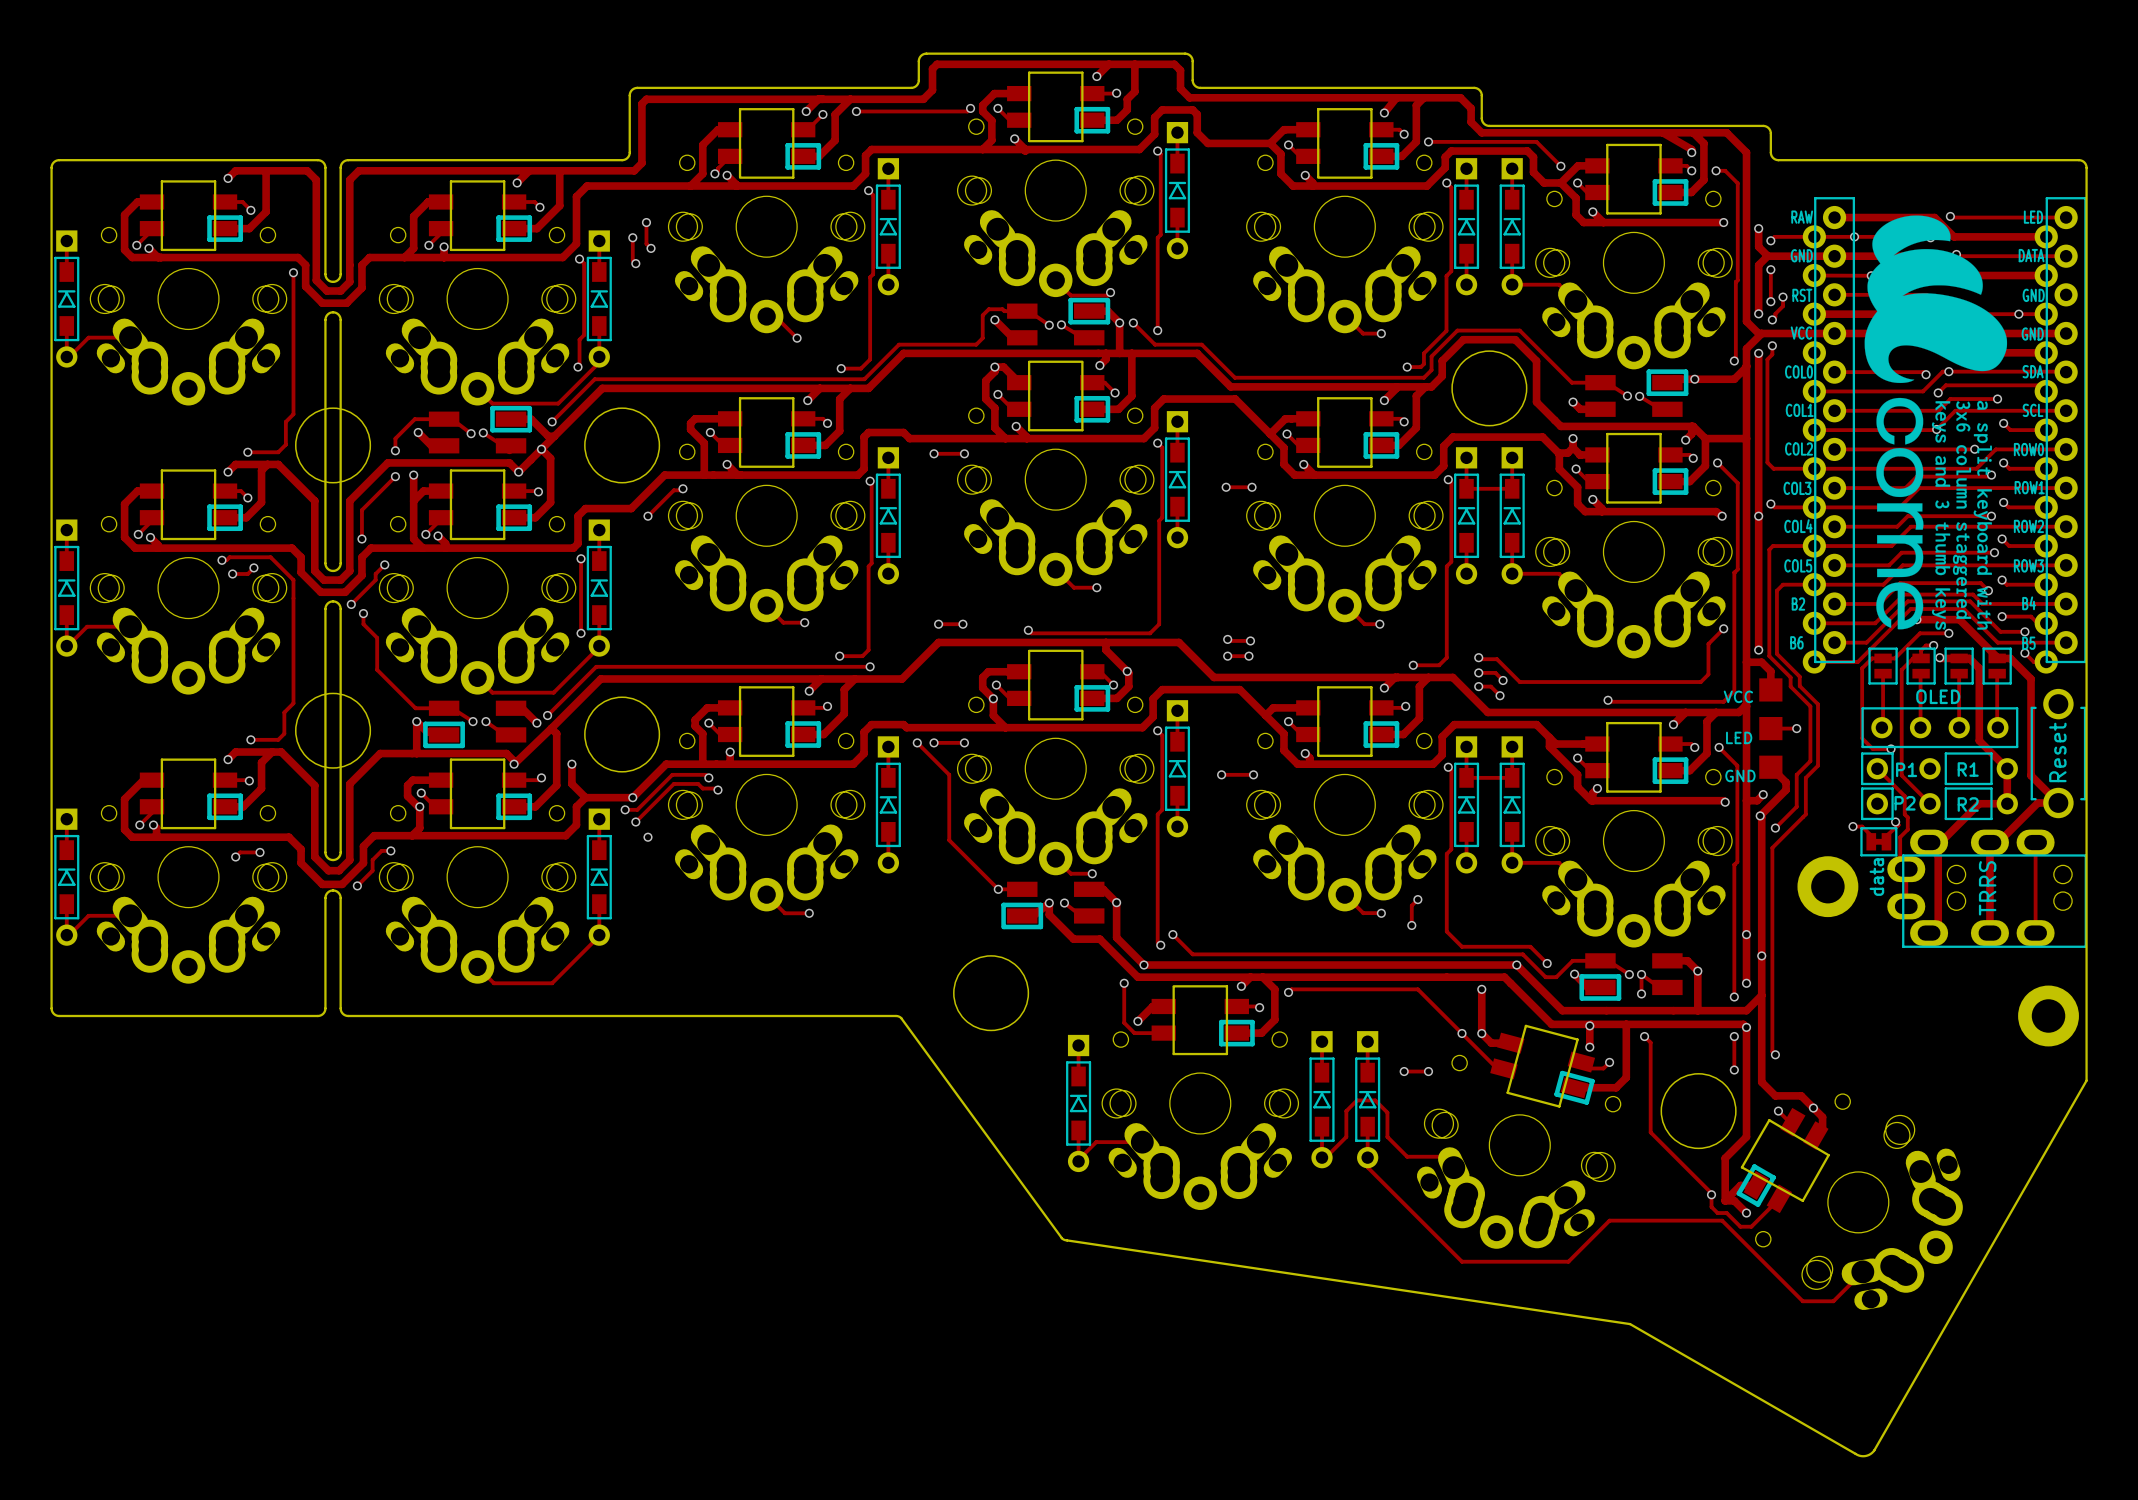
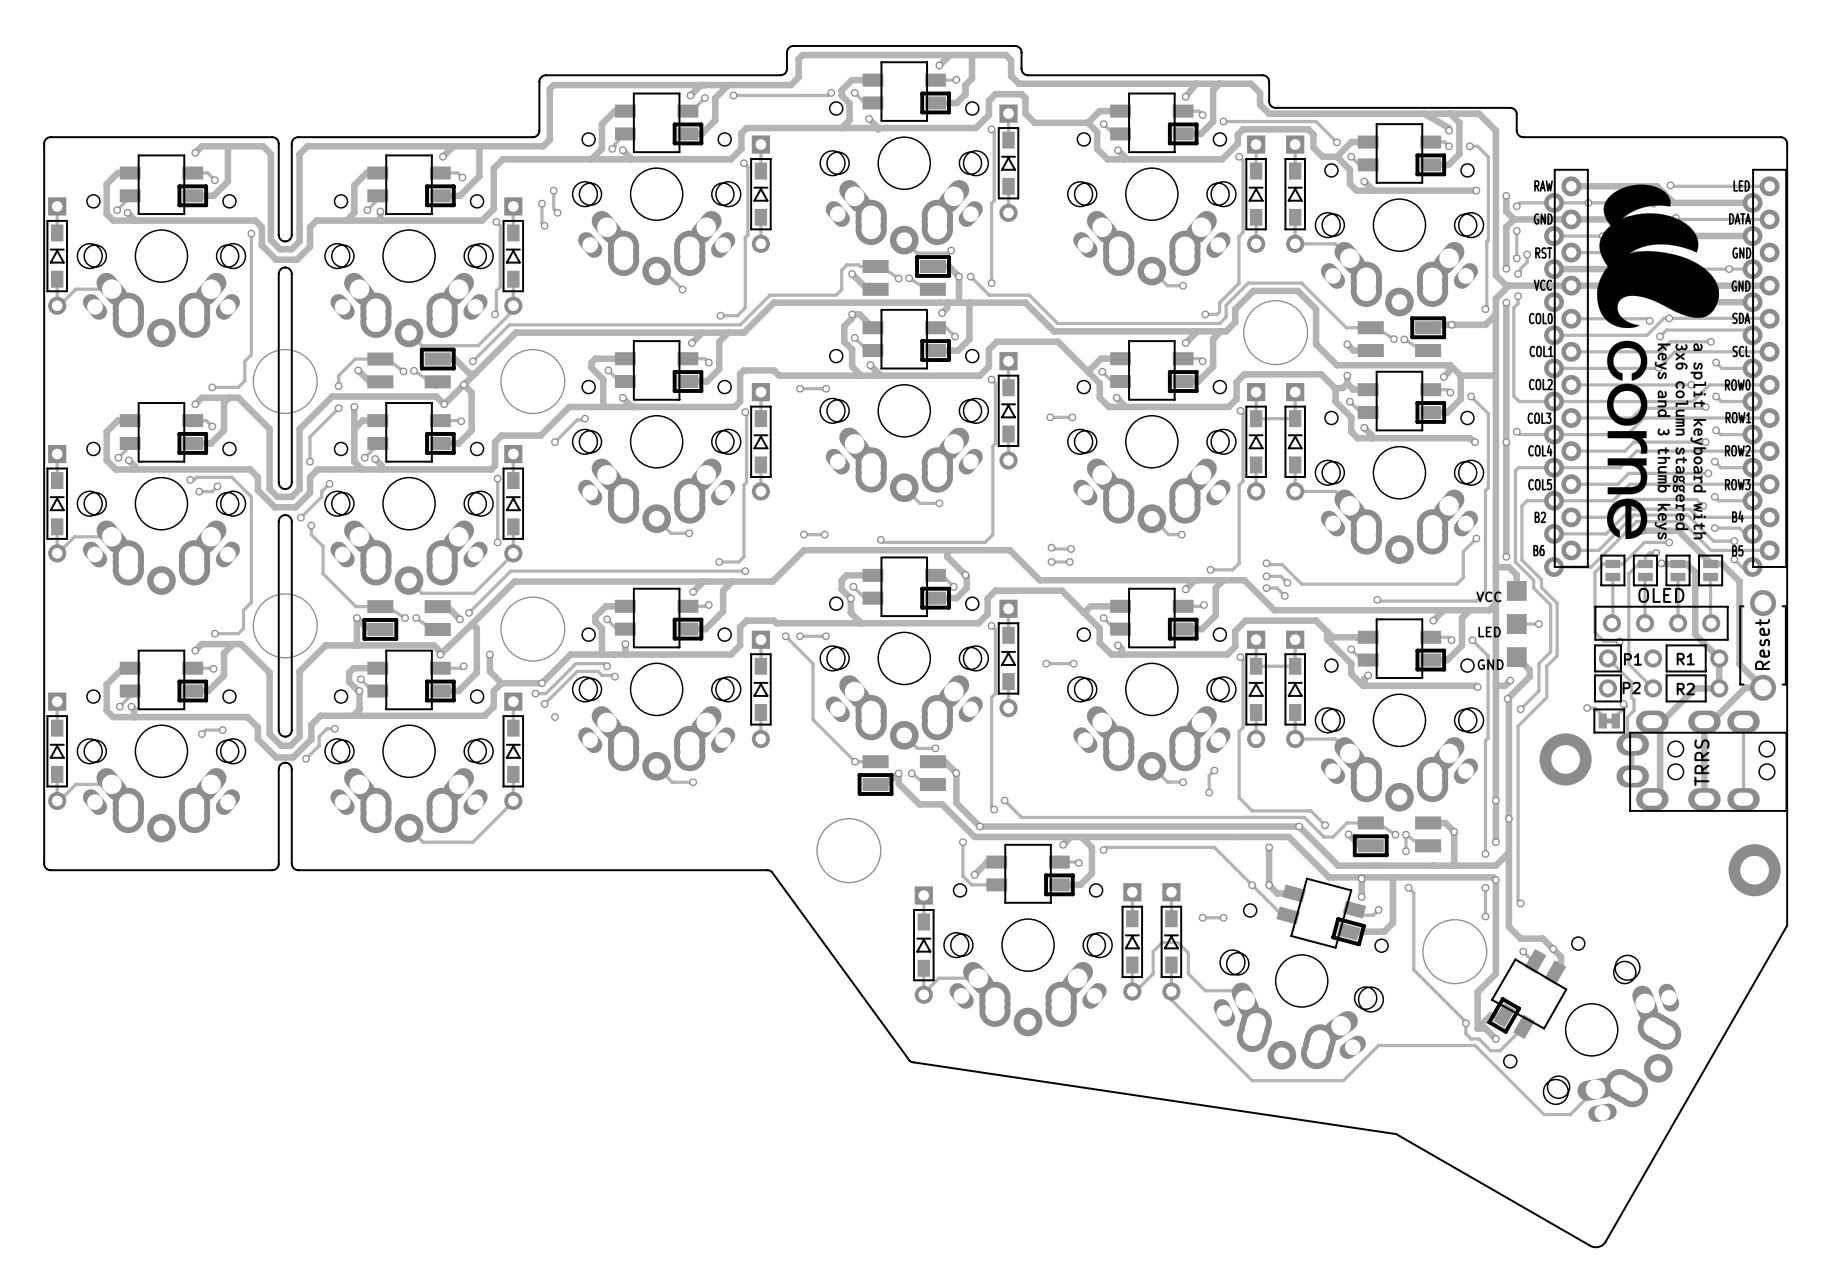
OLED text: none -> OLED (1661, 595)
OLED name: OLED (1938, 696) -> none
data name: data (1876, 877) -> none
TRRS name: TRRS (1987, 888) -> none
TRRS text: none -> TRRS (1701, 762)

